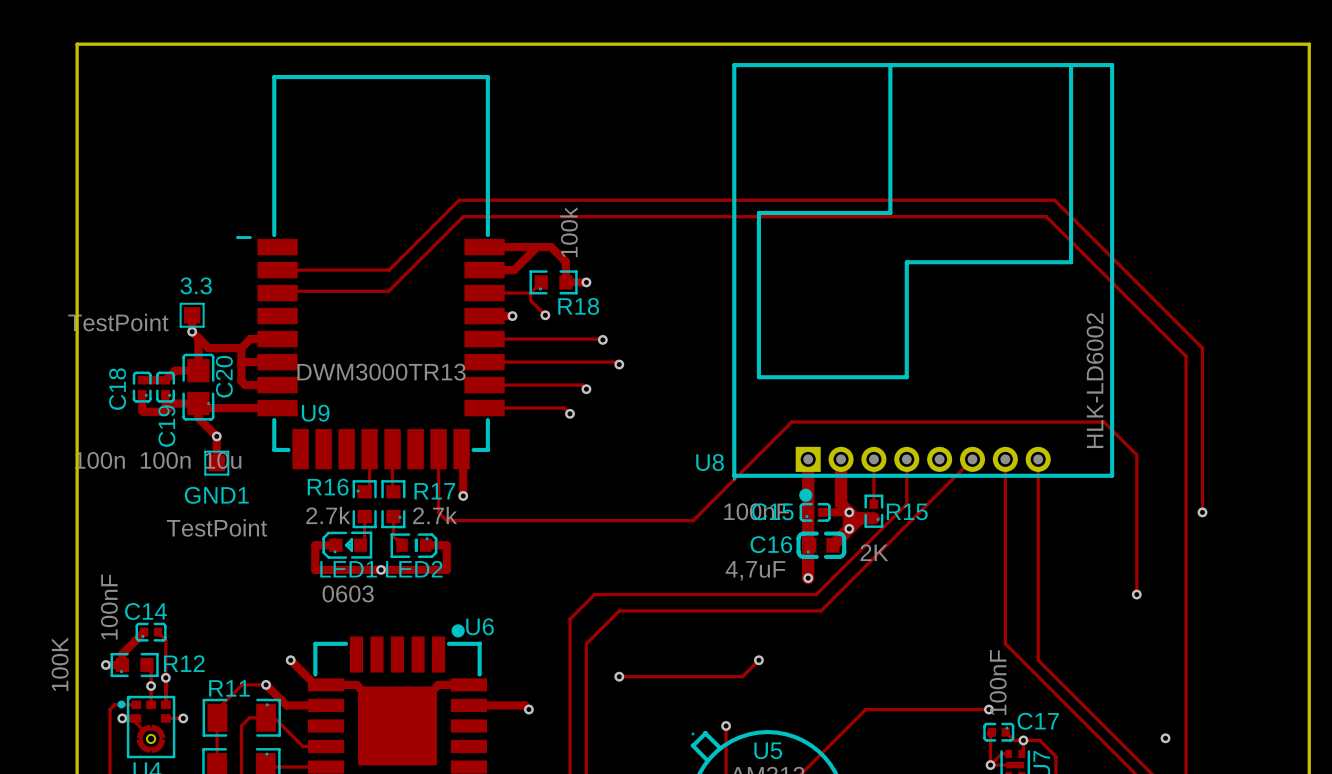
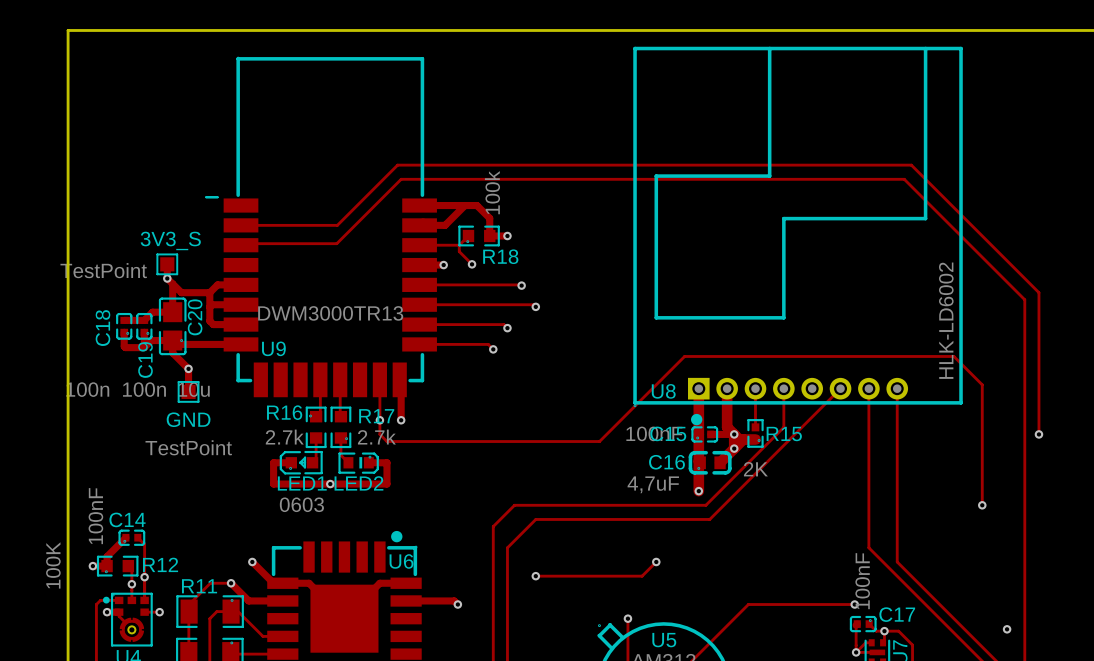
3.3 name: 3.3 (196, 285) -> 3V3_S (170, 240)
U8 name position: U8 (710, 462) -> U8 (663, 391)
GND1 name: GND1 (216, 495) -> GND (188, 419)
via: none -> (379, 420)
U6 name position: U6 (480, 626) -> U6 (401, 561)

